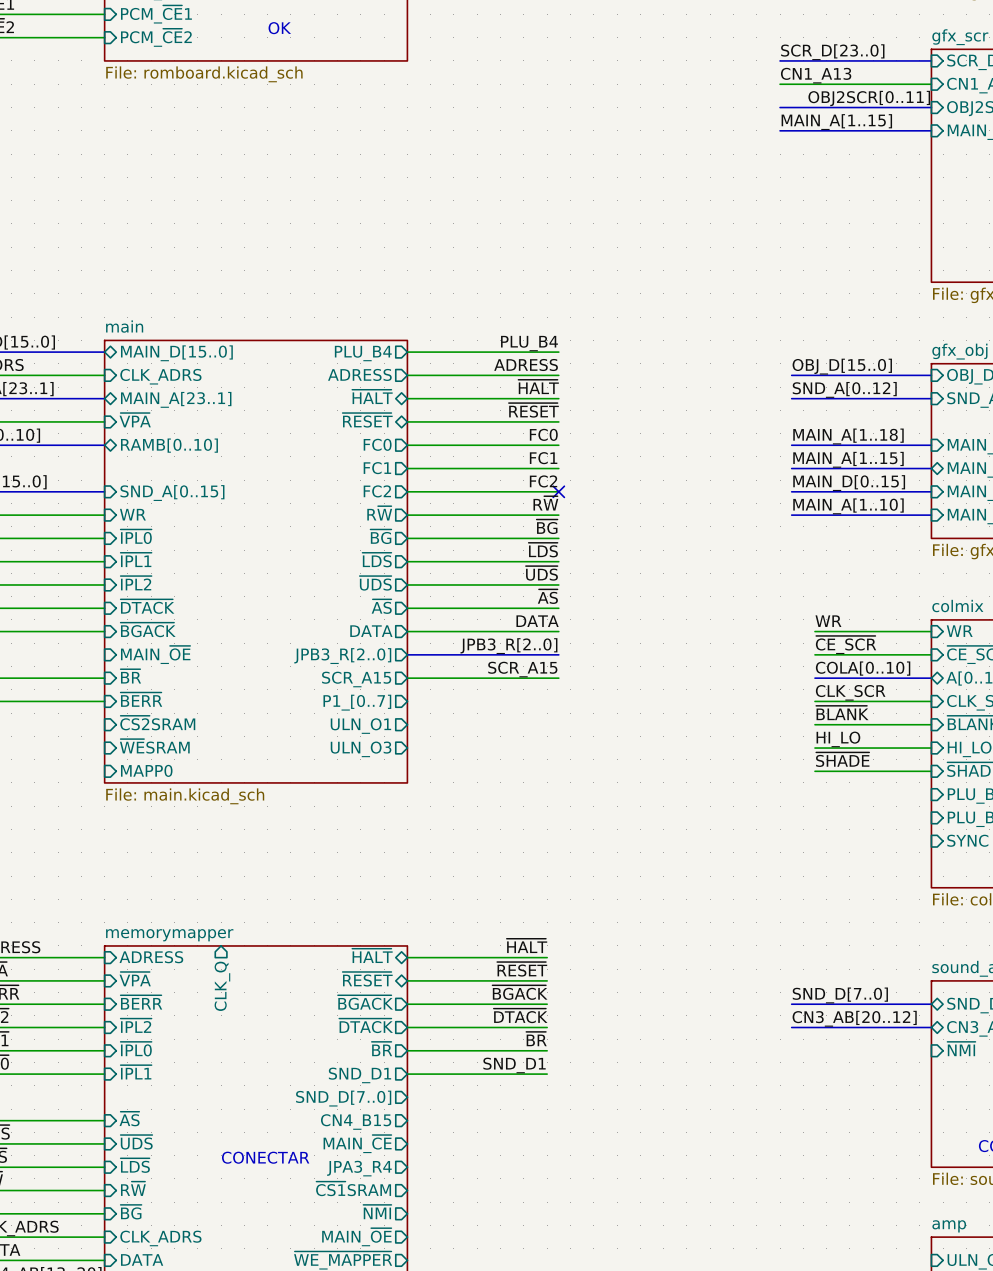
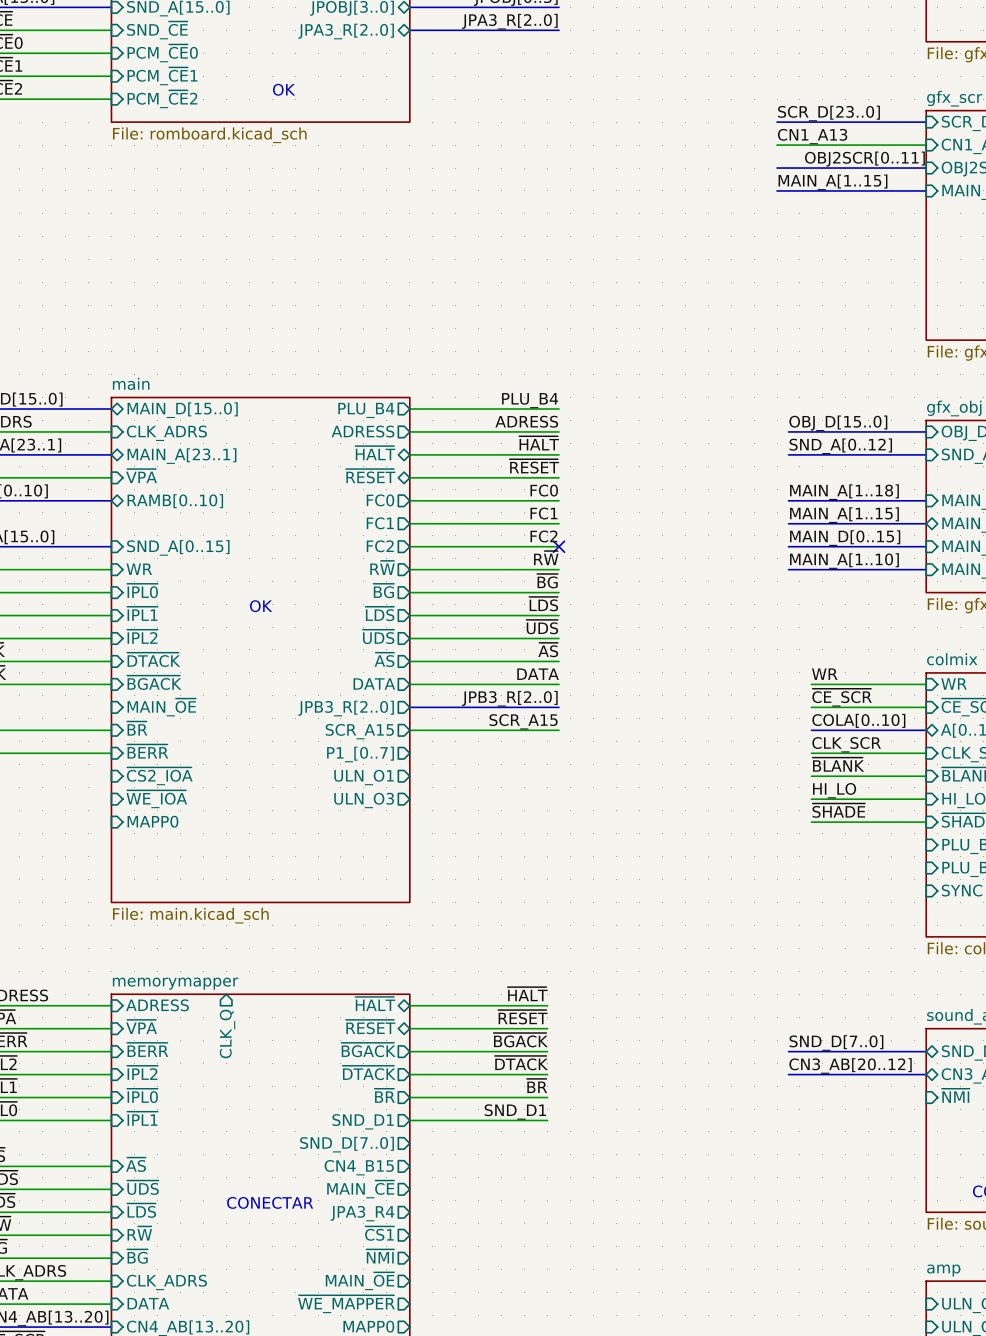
text: none -> OK (261, 606)
sheet main: File: main.kicad_sch (256, 561) -> none
sheet main: none -> File: main.kicad_sch (260, 649)
sheet pin: ~{CS2}SRAM (157, 723) -> ~{CS2_IOA} (159, 776)
sheet pin: ~{WE}SRAM (154, 746) -> ~{WE_IOA} (156, 799)
sheet pin: ~{CS1}SRAM (353, 1188) -> ~{CS1} (379, 1233)

